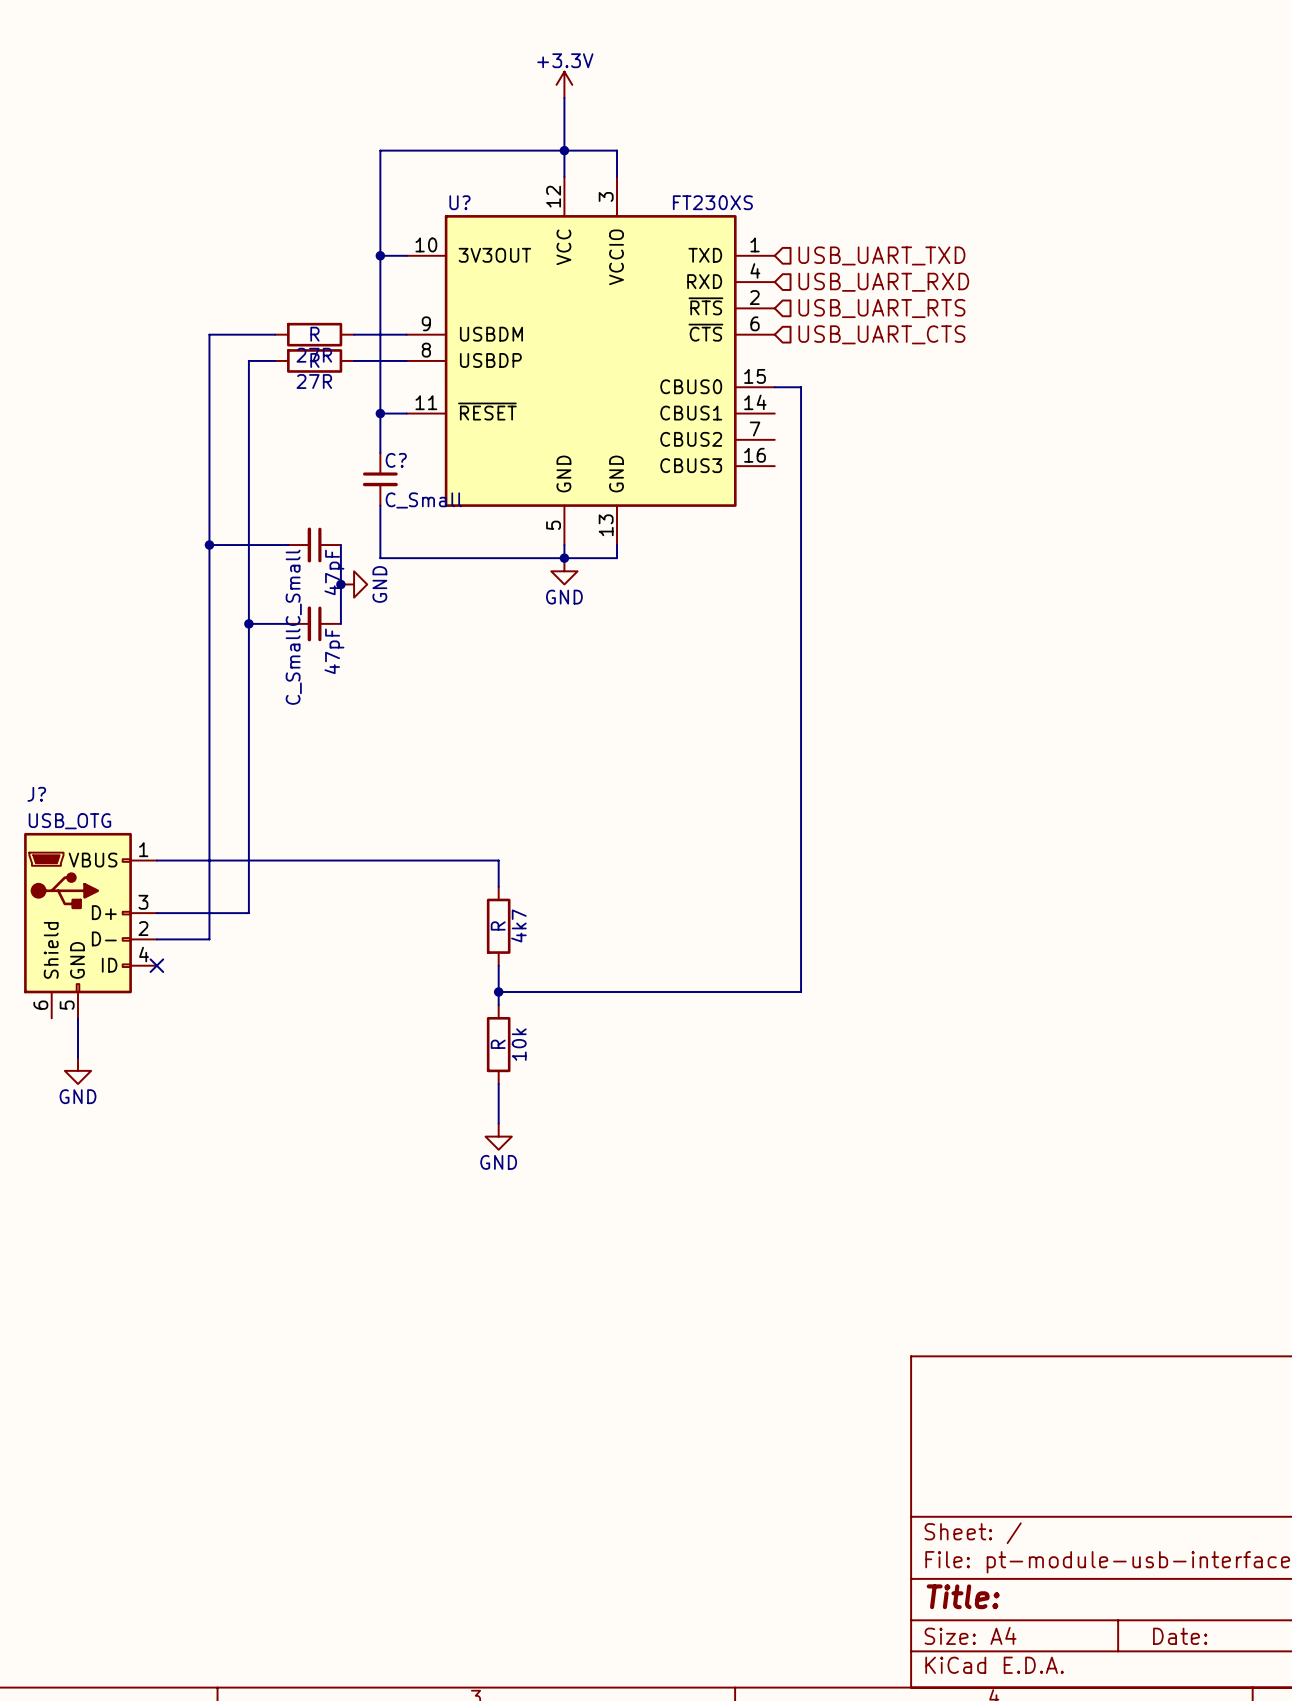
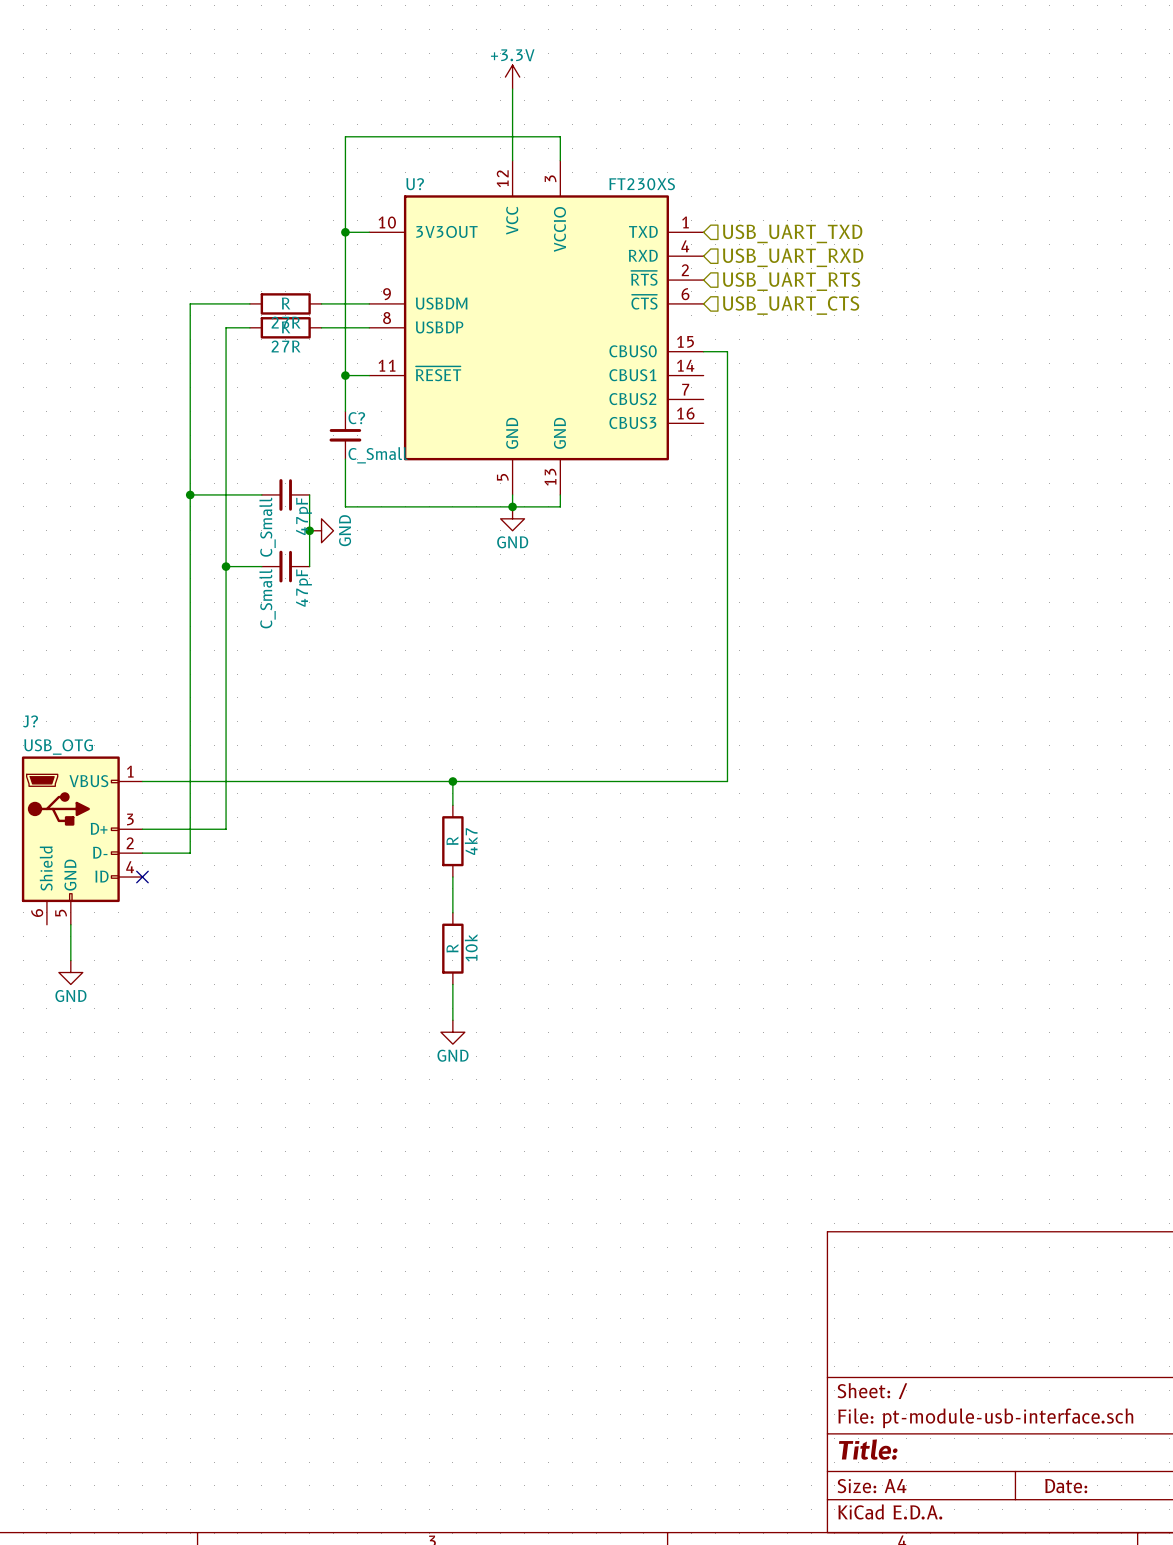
junction: (564, 150) -> none
junction: none -> (452, 781)
wire: (801, 860) (801, 992) (498, 992) -> (727, 781) (452, 781)
junction: (498, 992) -> none

